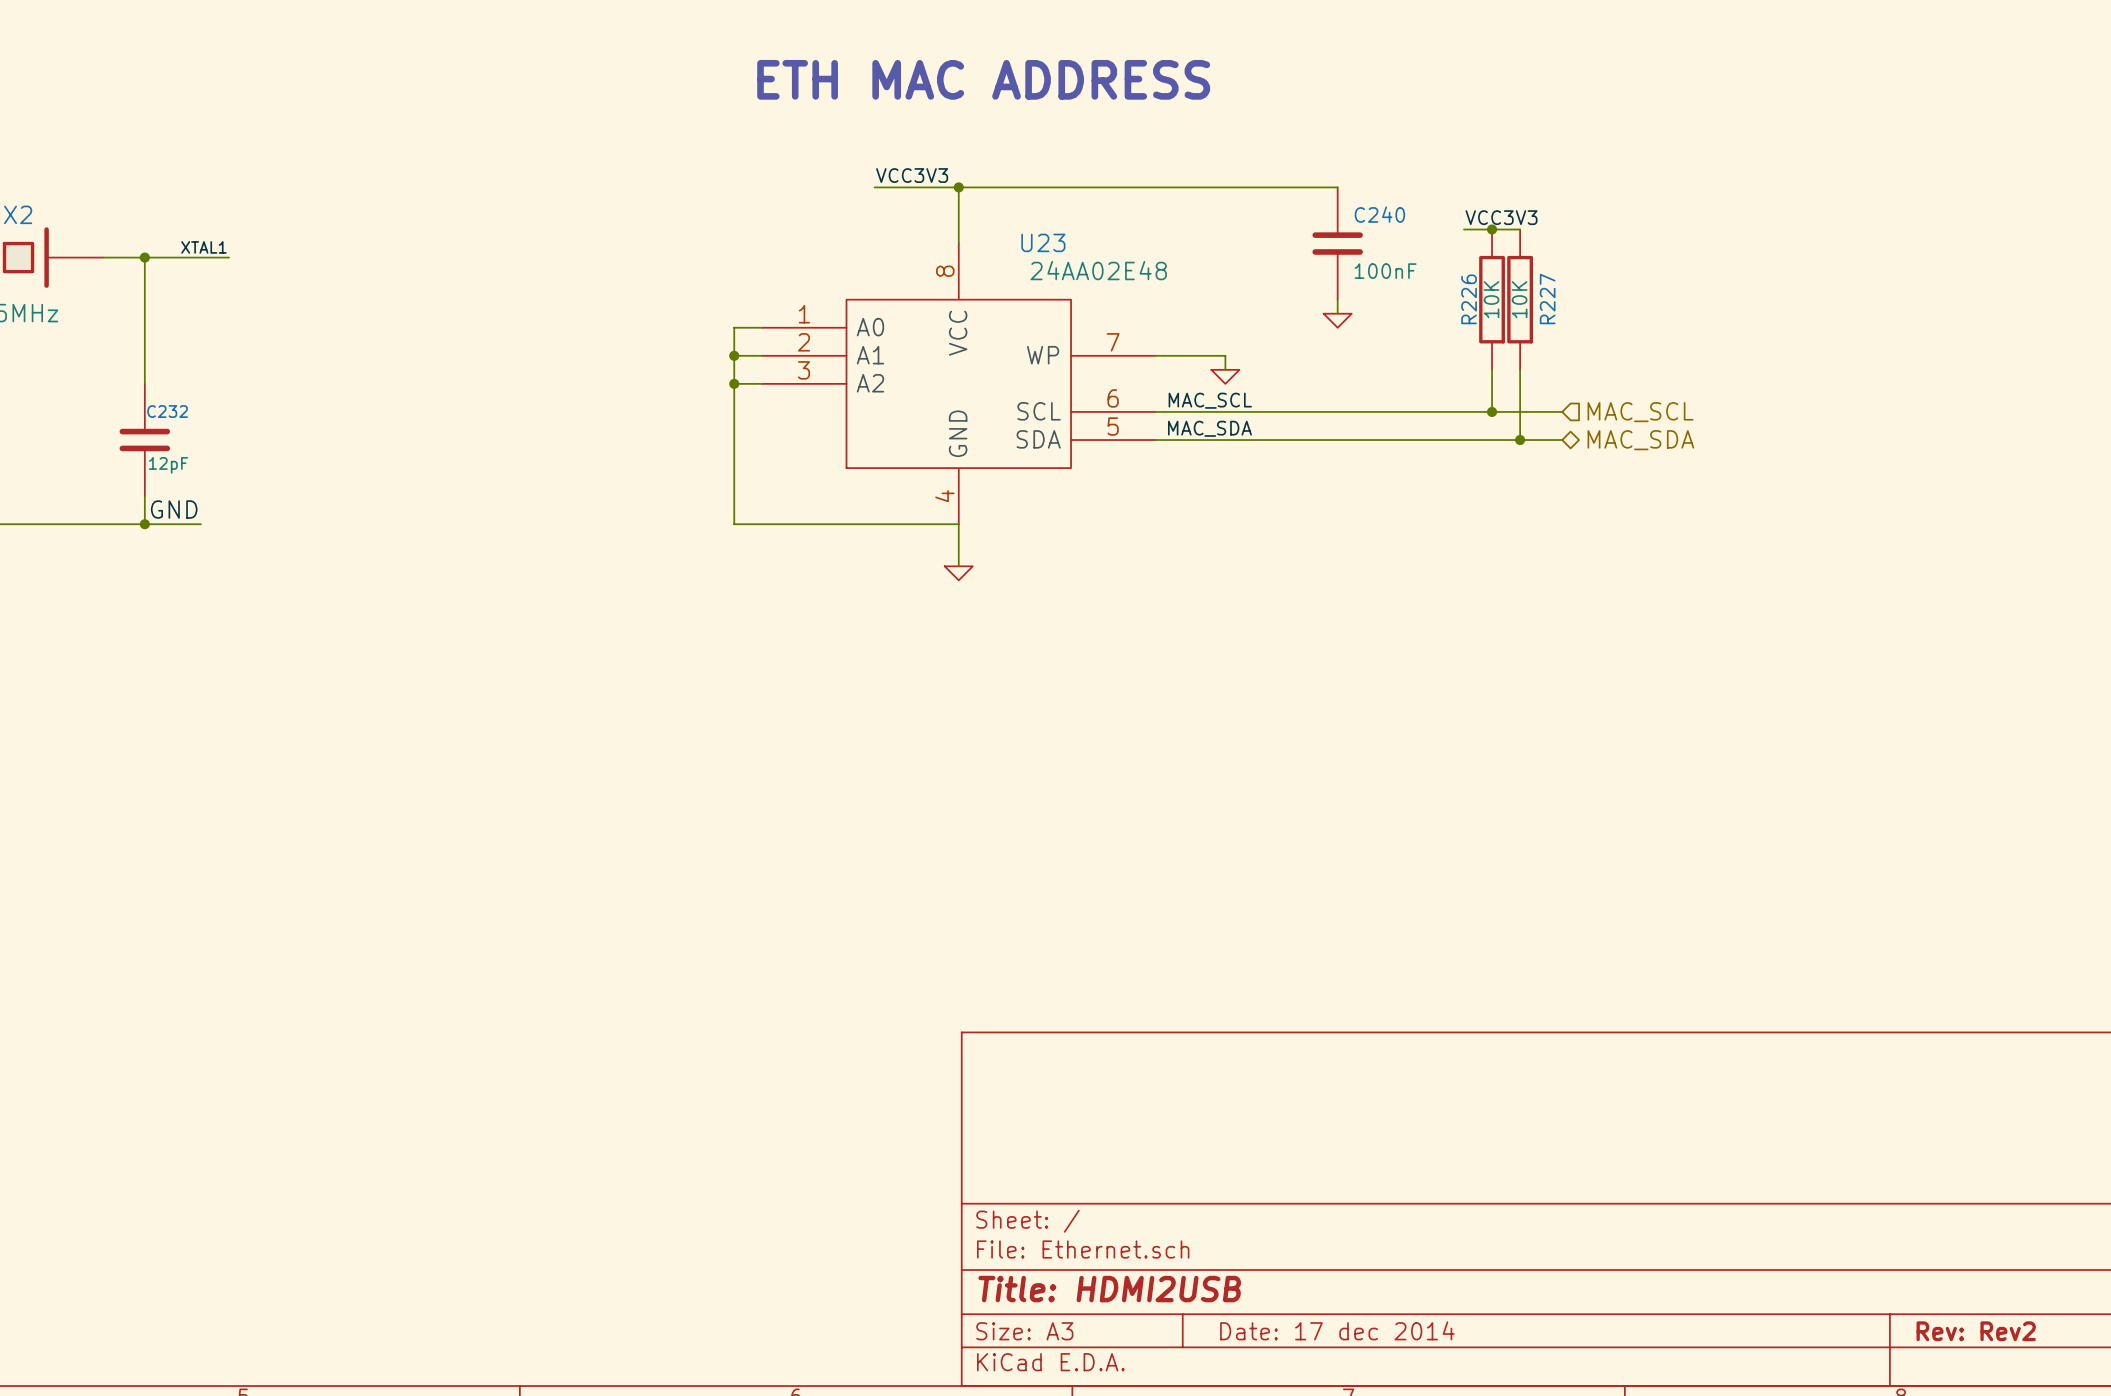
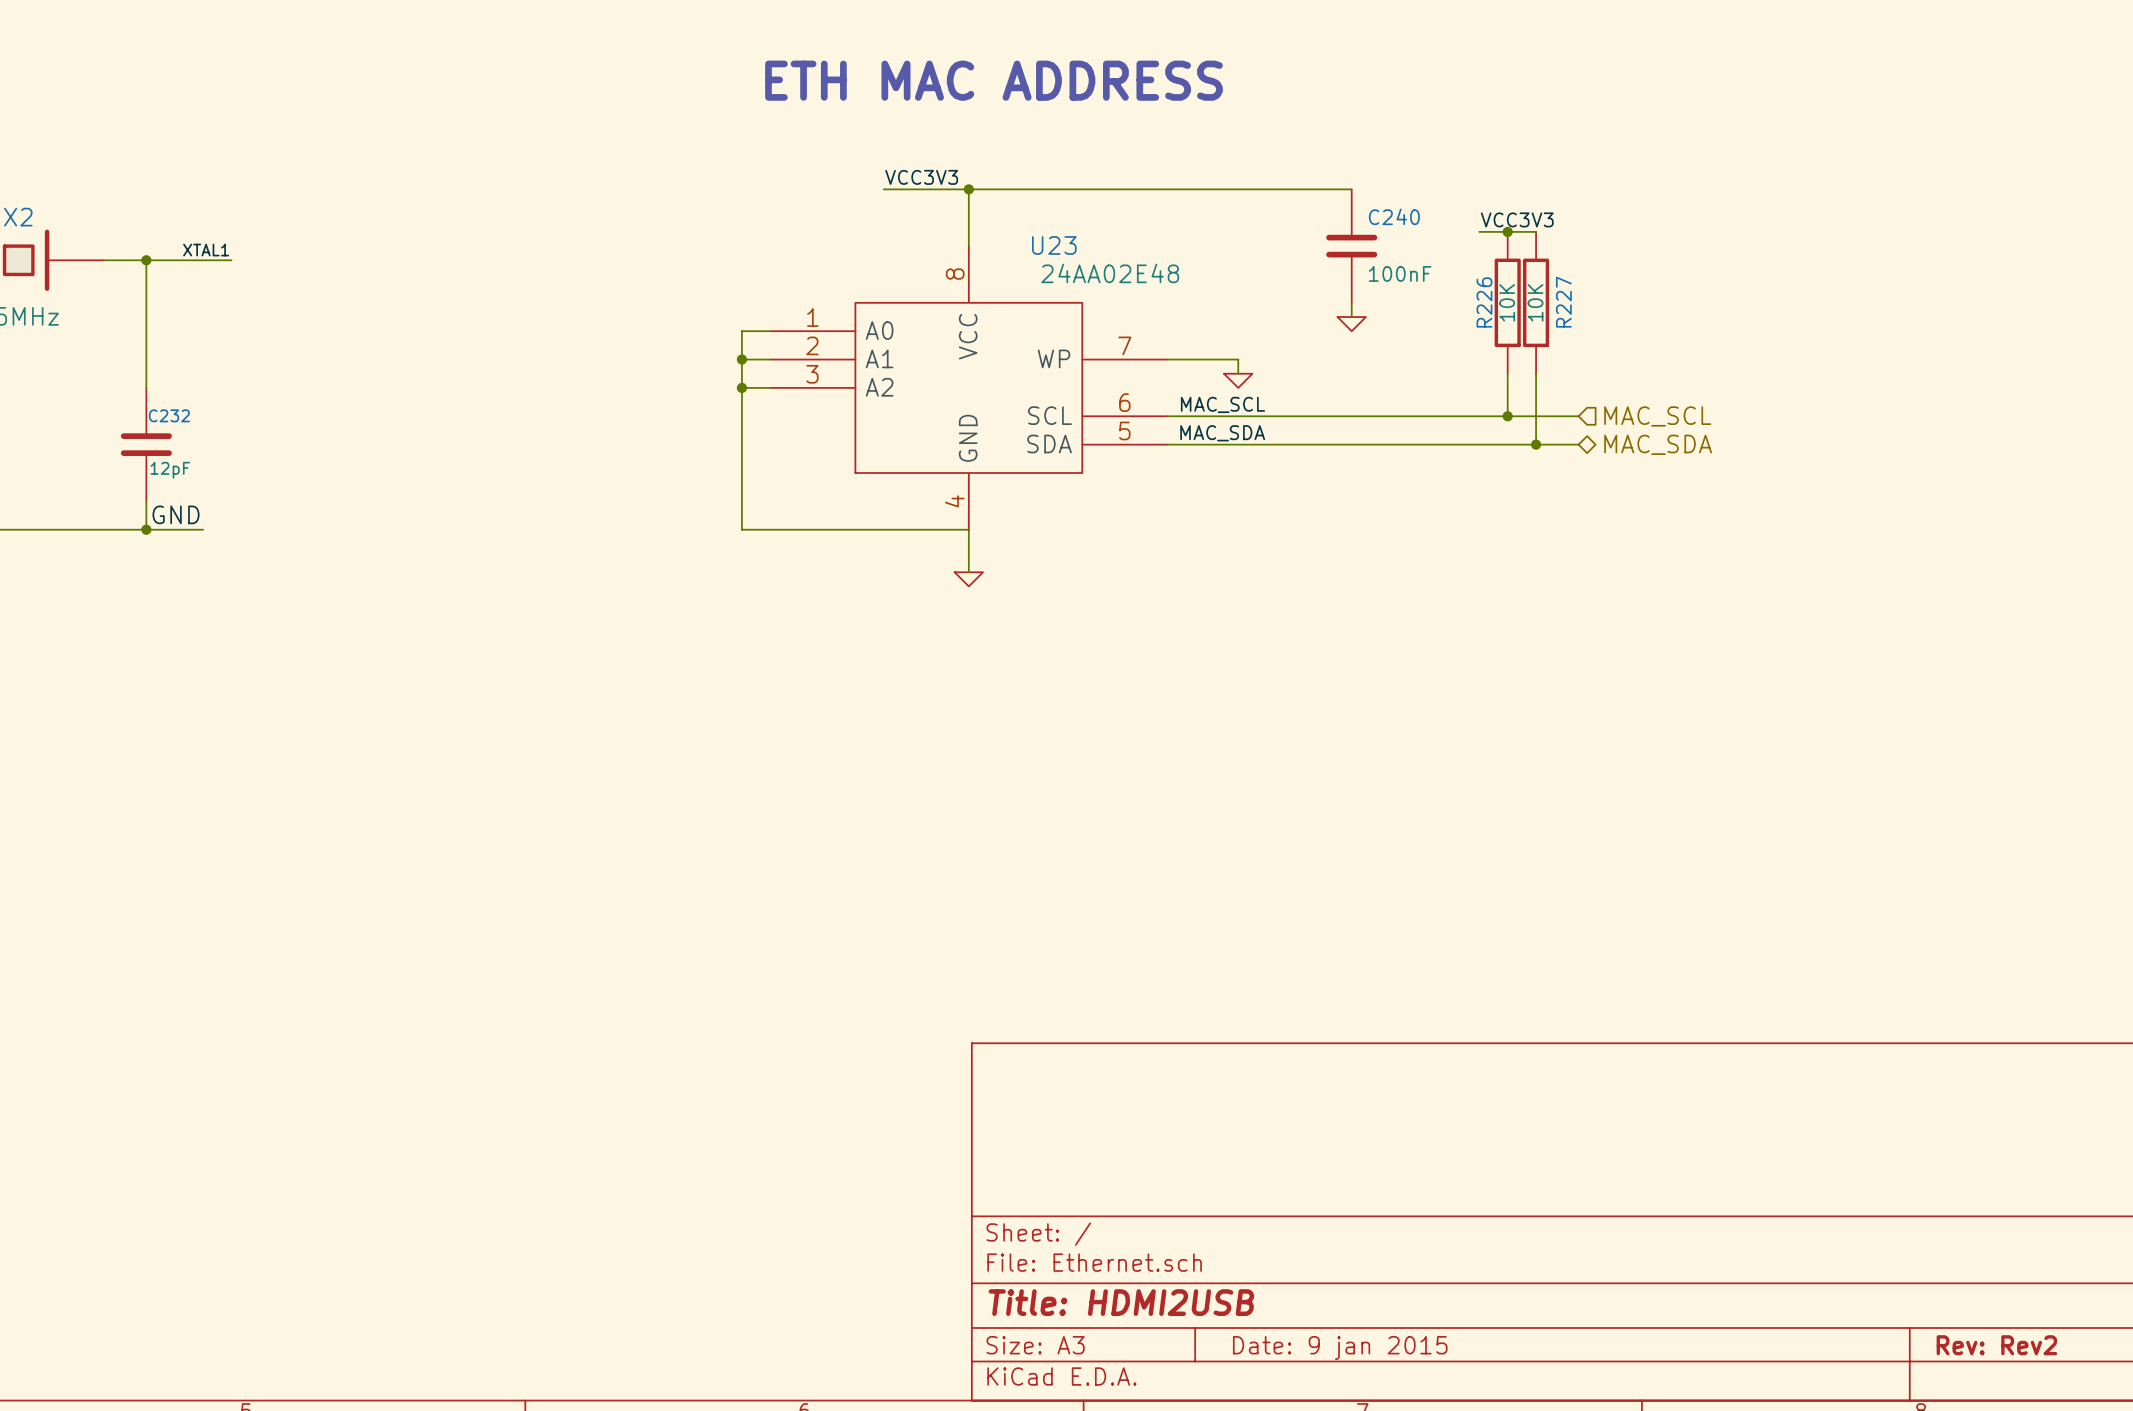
title block: Date: 17 dec 2014 (1337, 1330) -> Date: 9 jan 2015 (1340, 1348)

